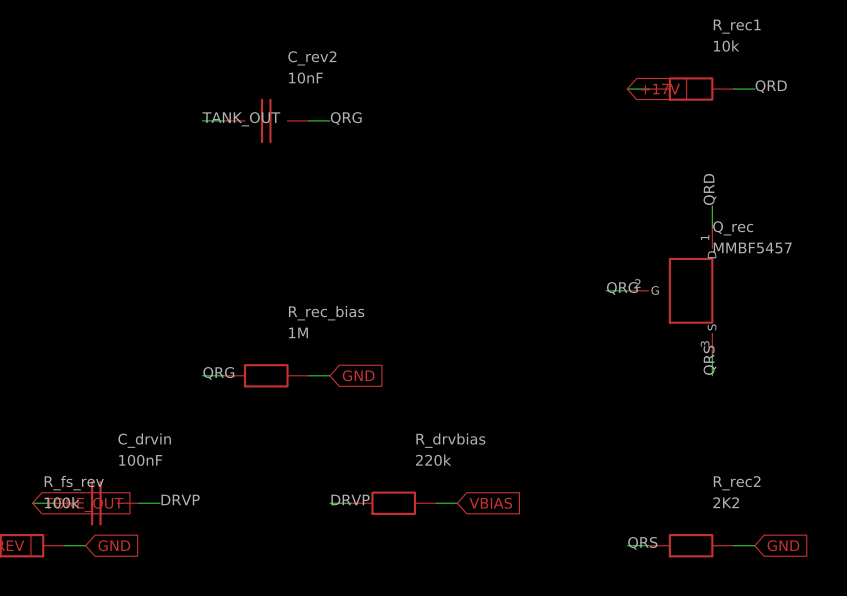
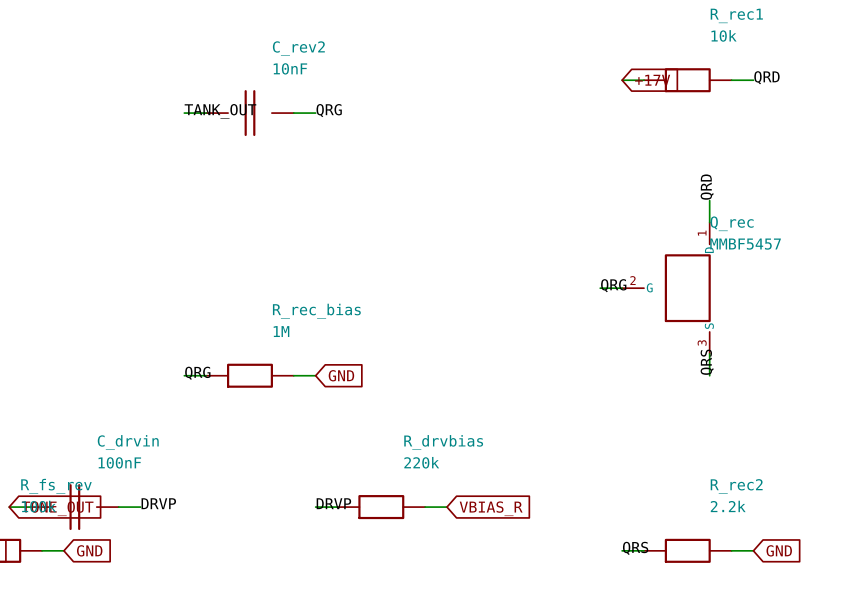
R_rec2 value: 2K2 (726, 502) -> 2.2k (728, 506)
global label: VBIAS (490, 503) -> VBIAS_R (491, 508)

